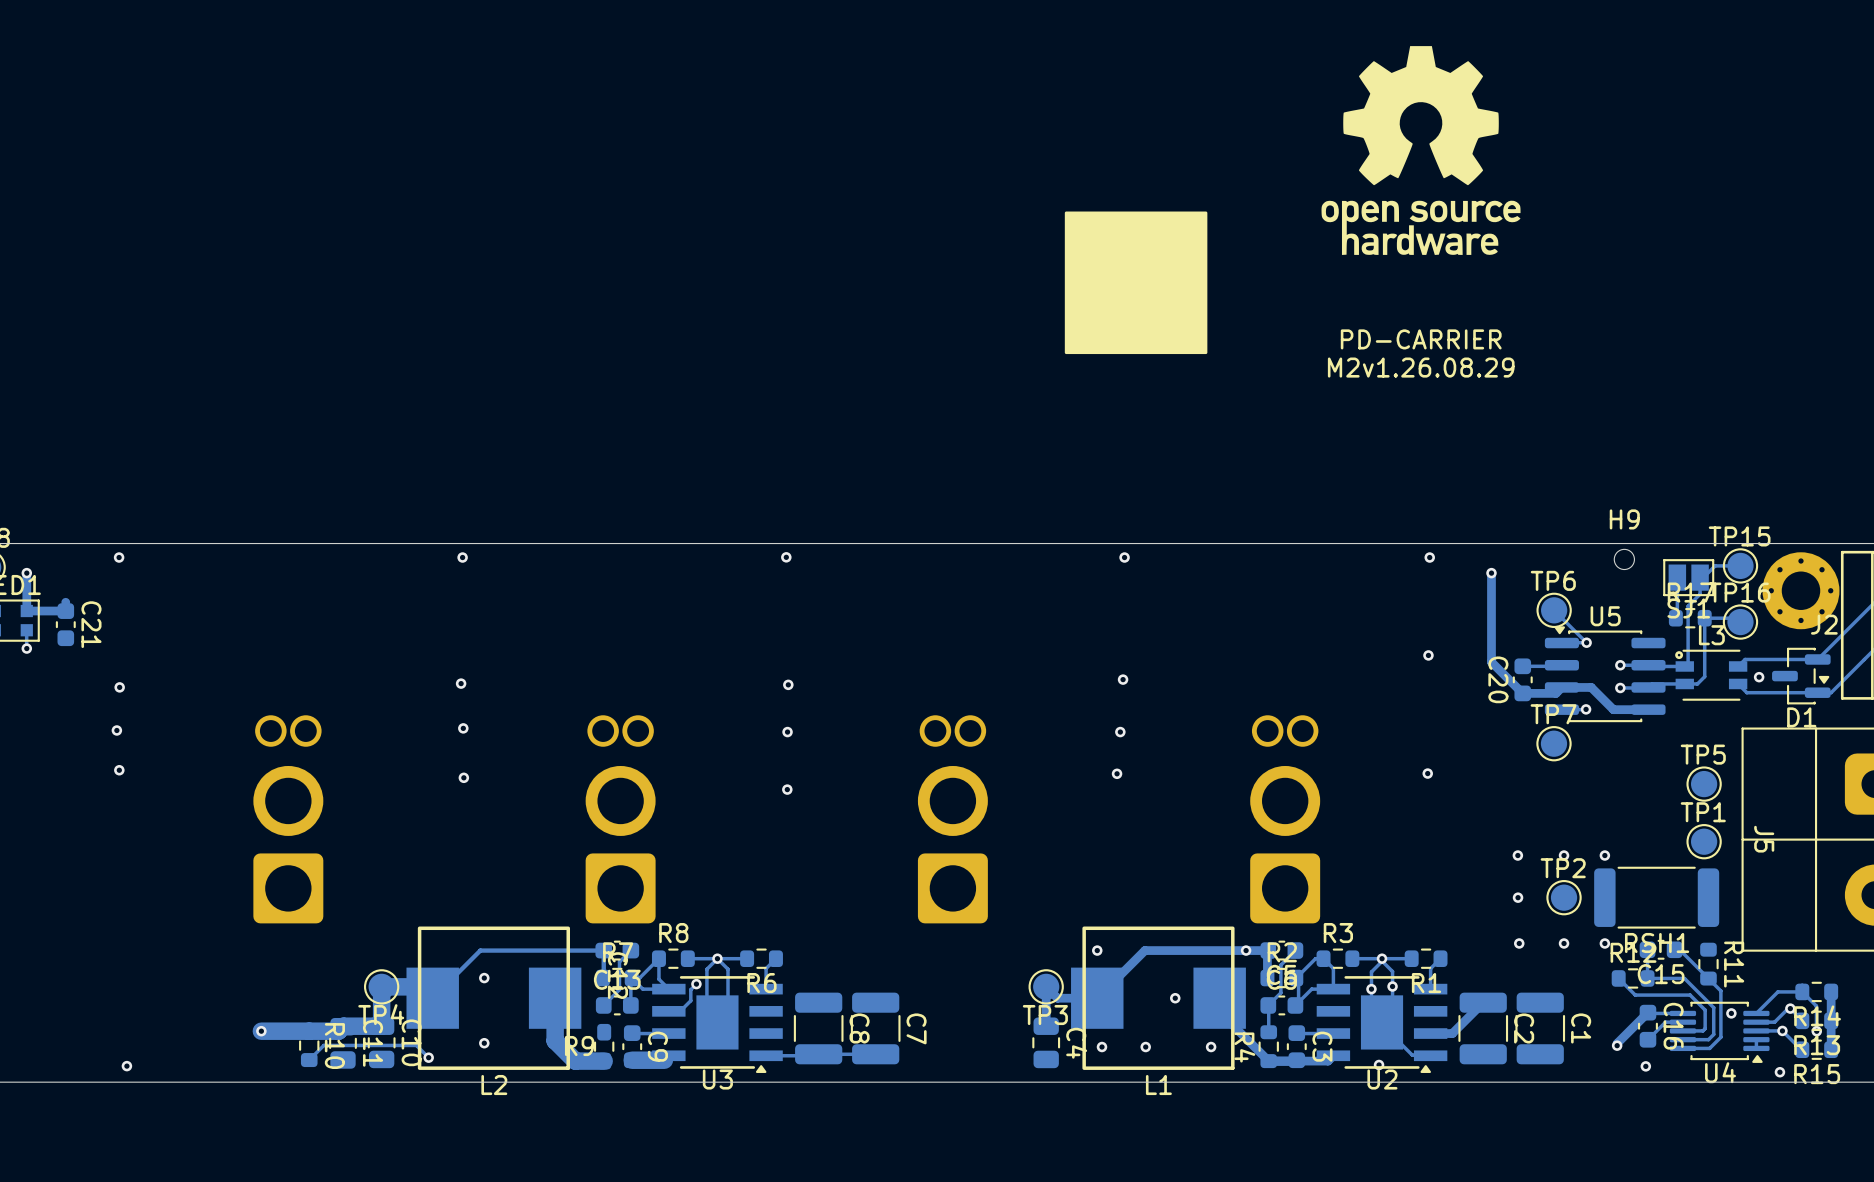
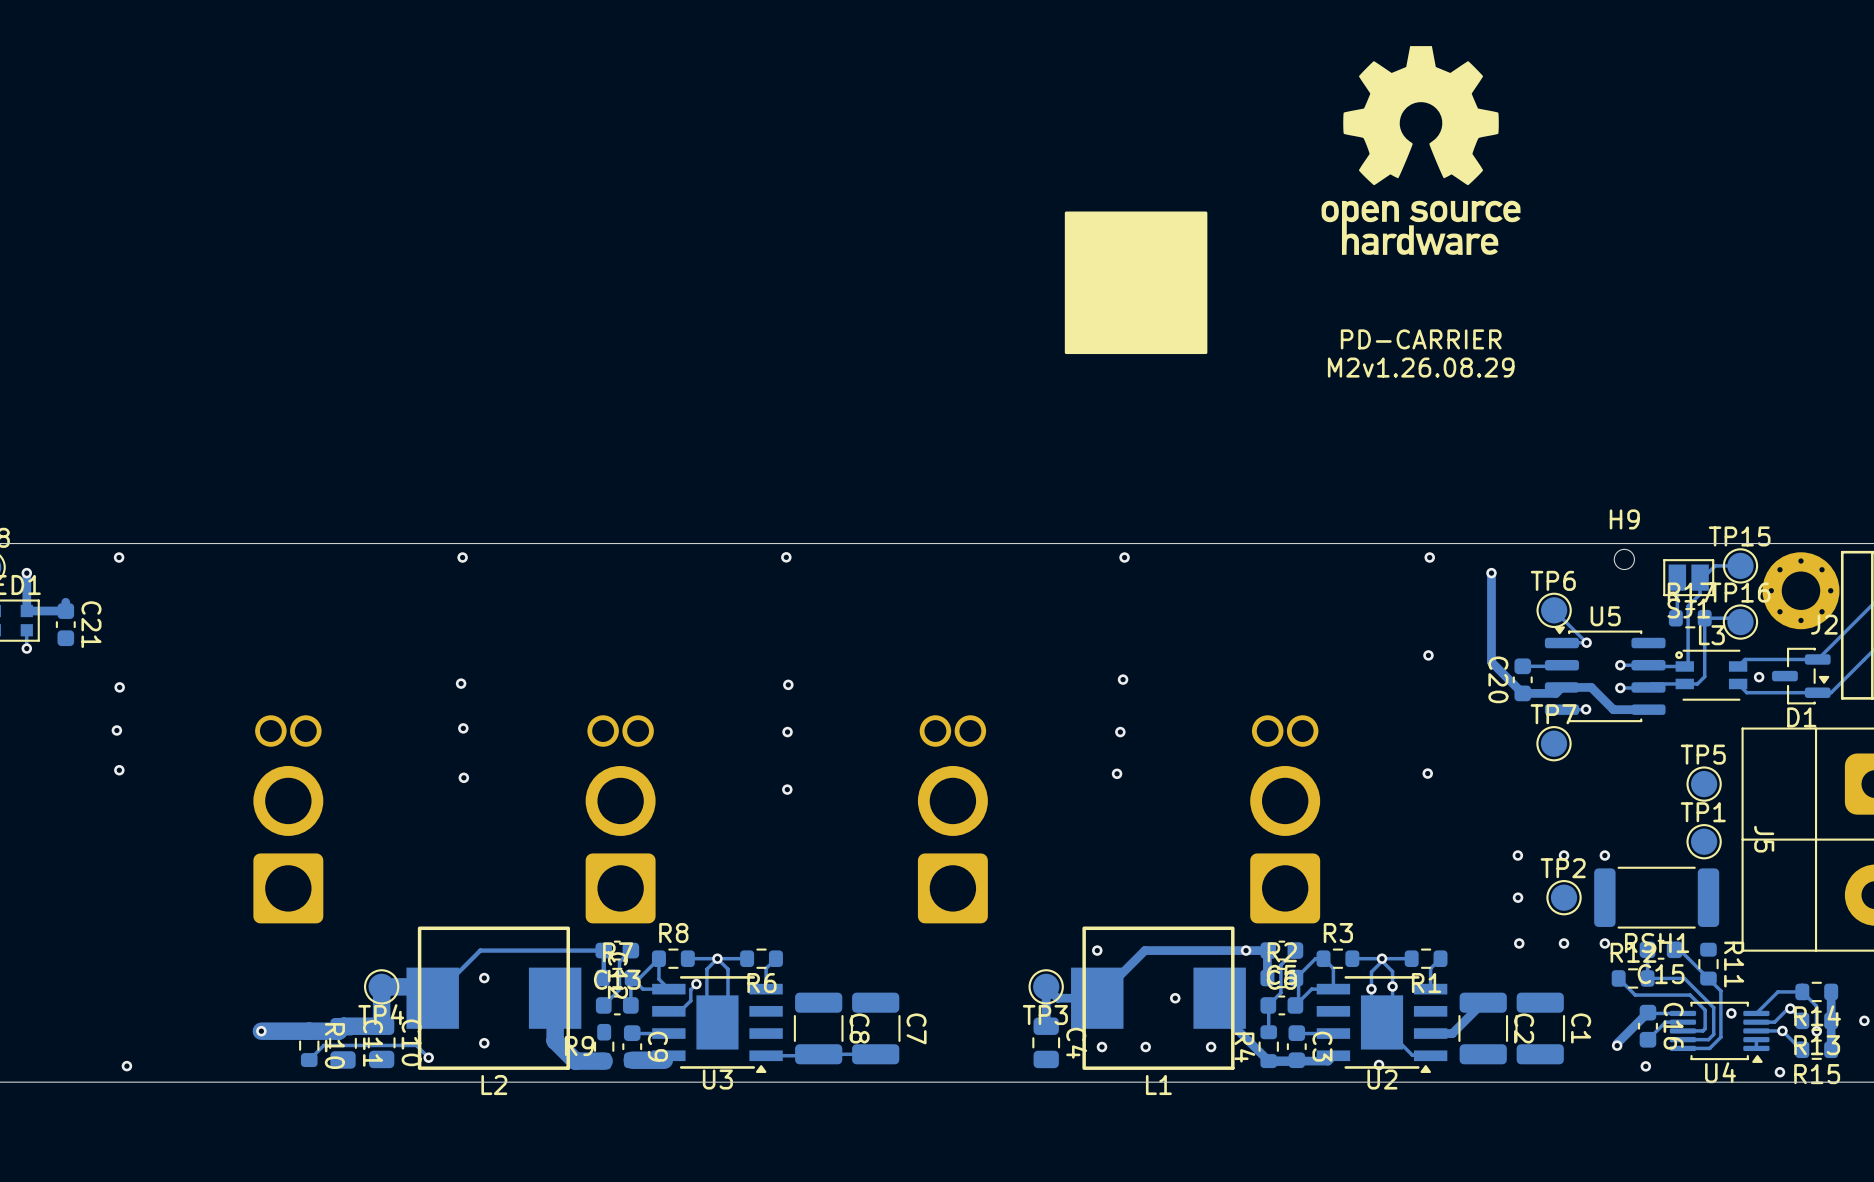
via: none -> (1864, 1020)

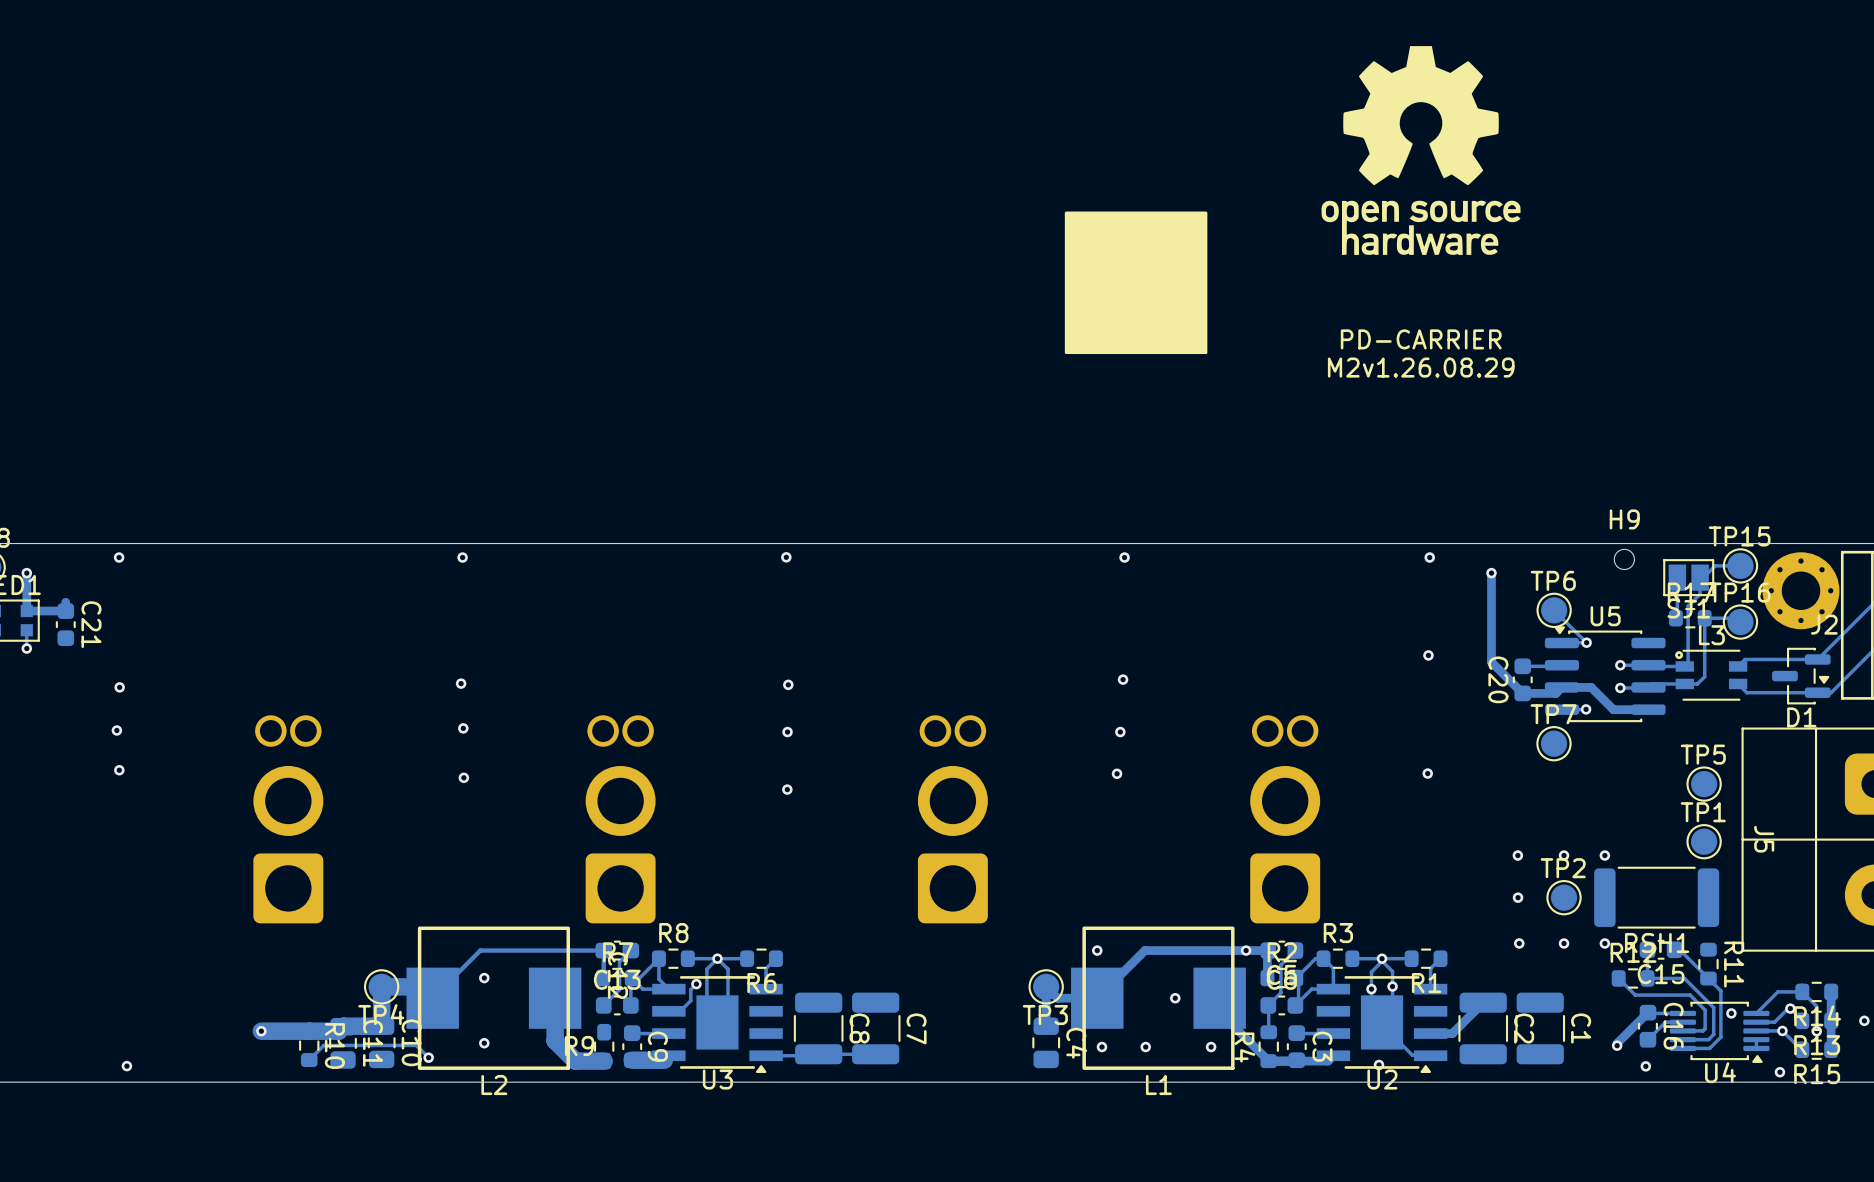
via: (1759, 677) -> none

